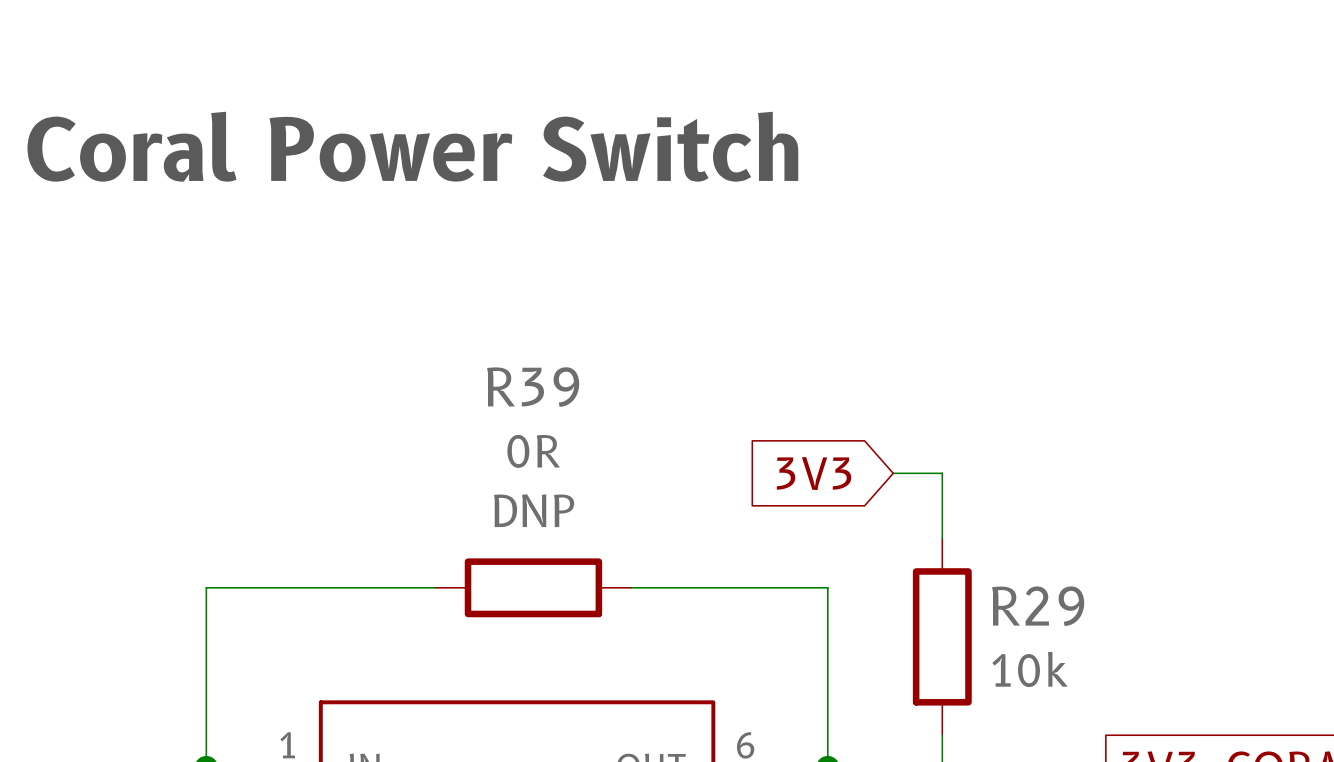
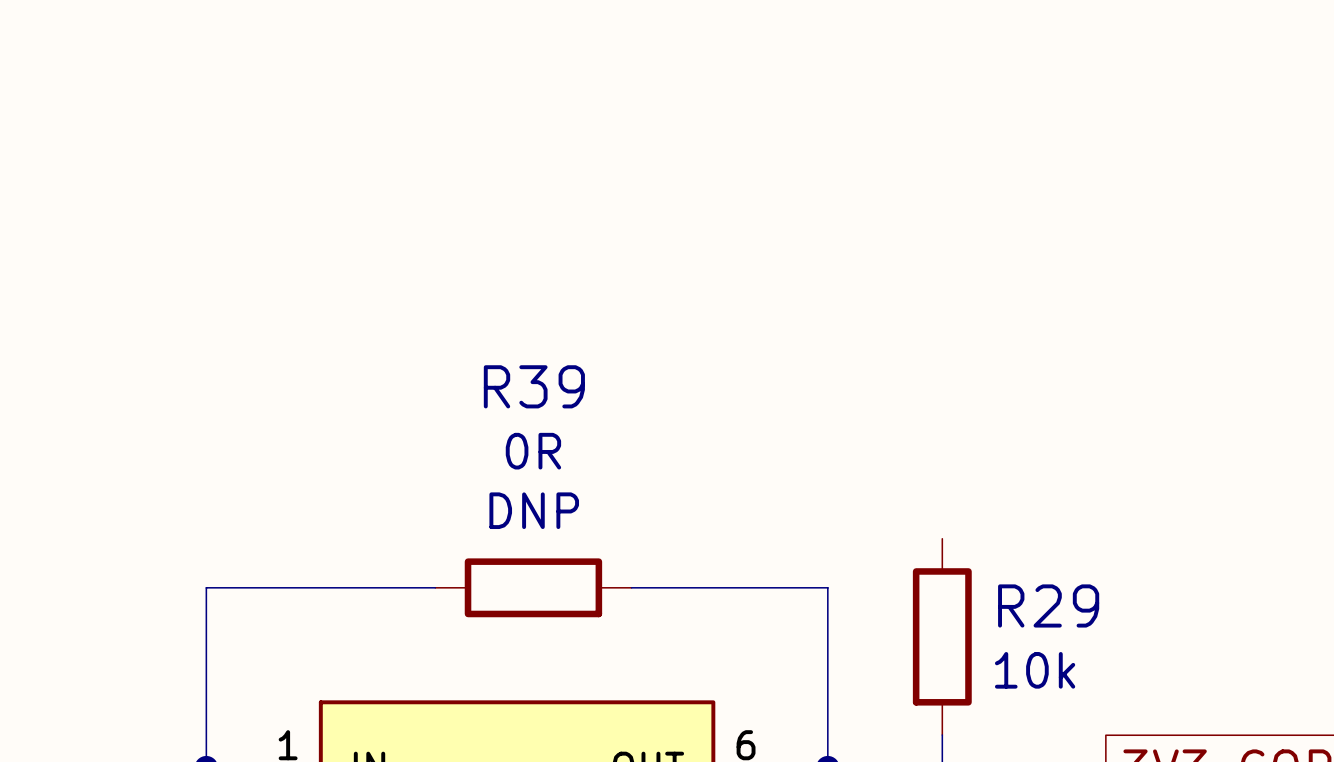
text: Coral Power Switch (412, 146) -> none
global label: 3V3 (814, 473) -> none
wire: (893, 473) (942, 473) (942, 538) -> none

